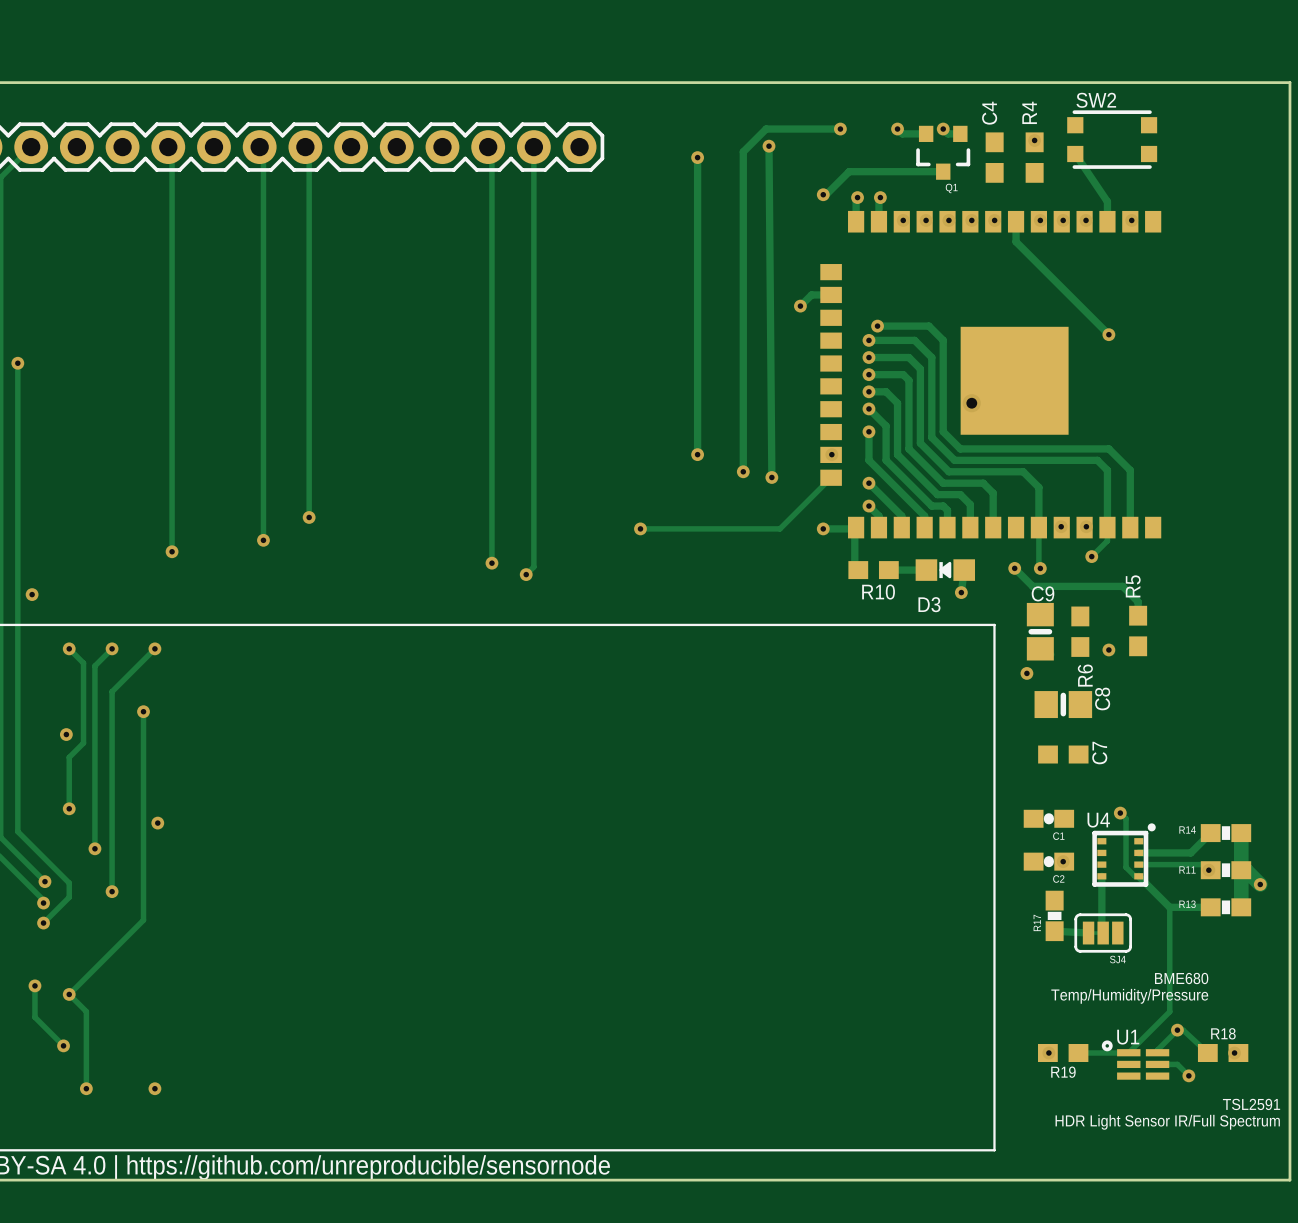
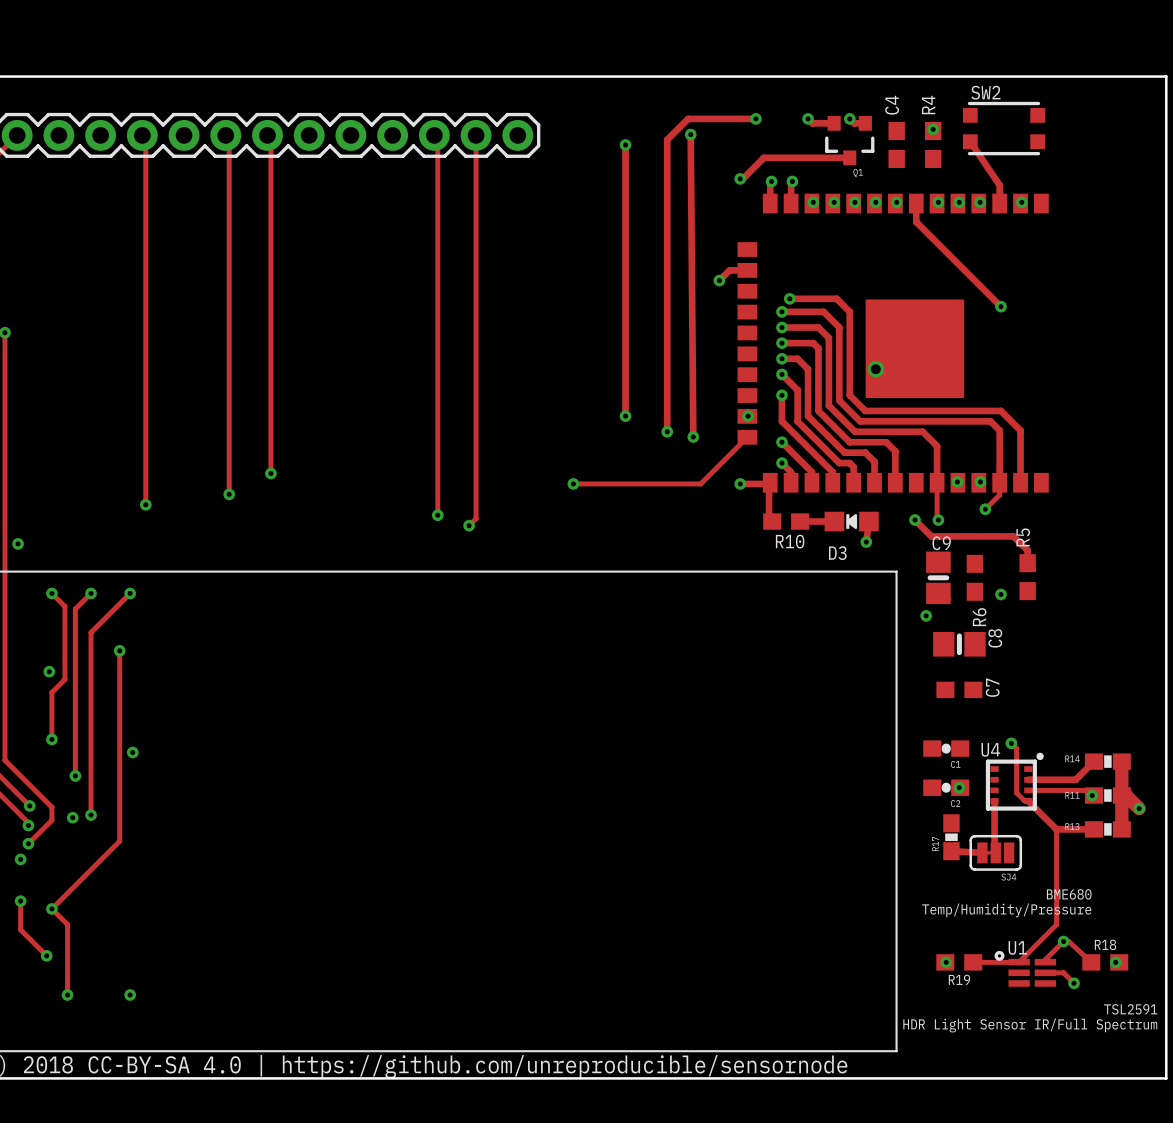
via: none -> (72, 817)
via: none -> (20, 859)

